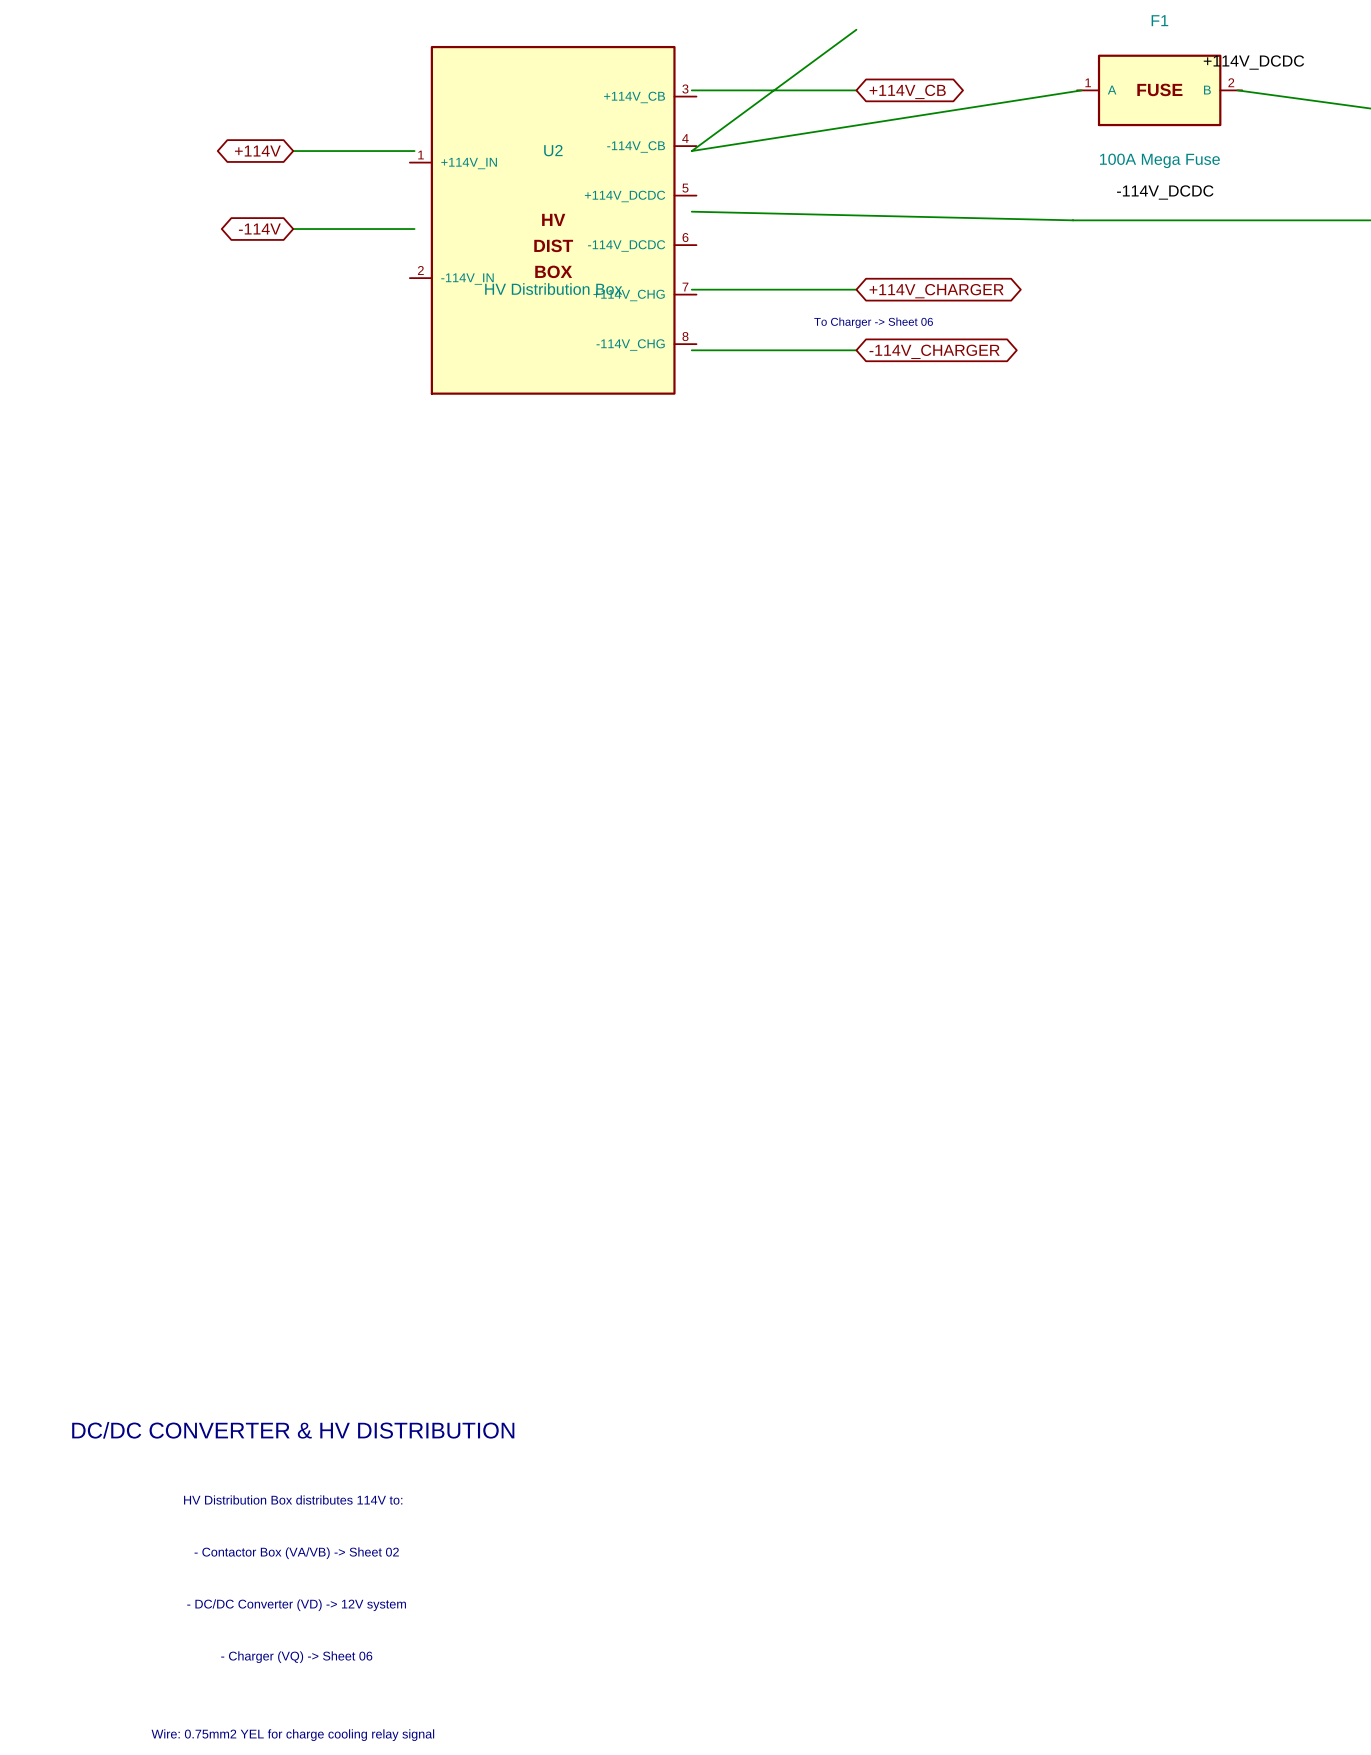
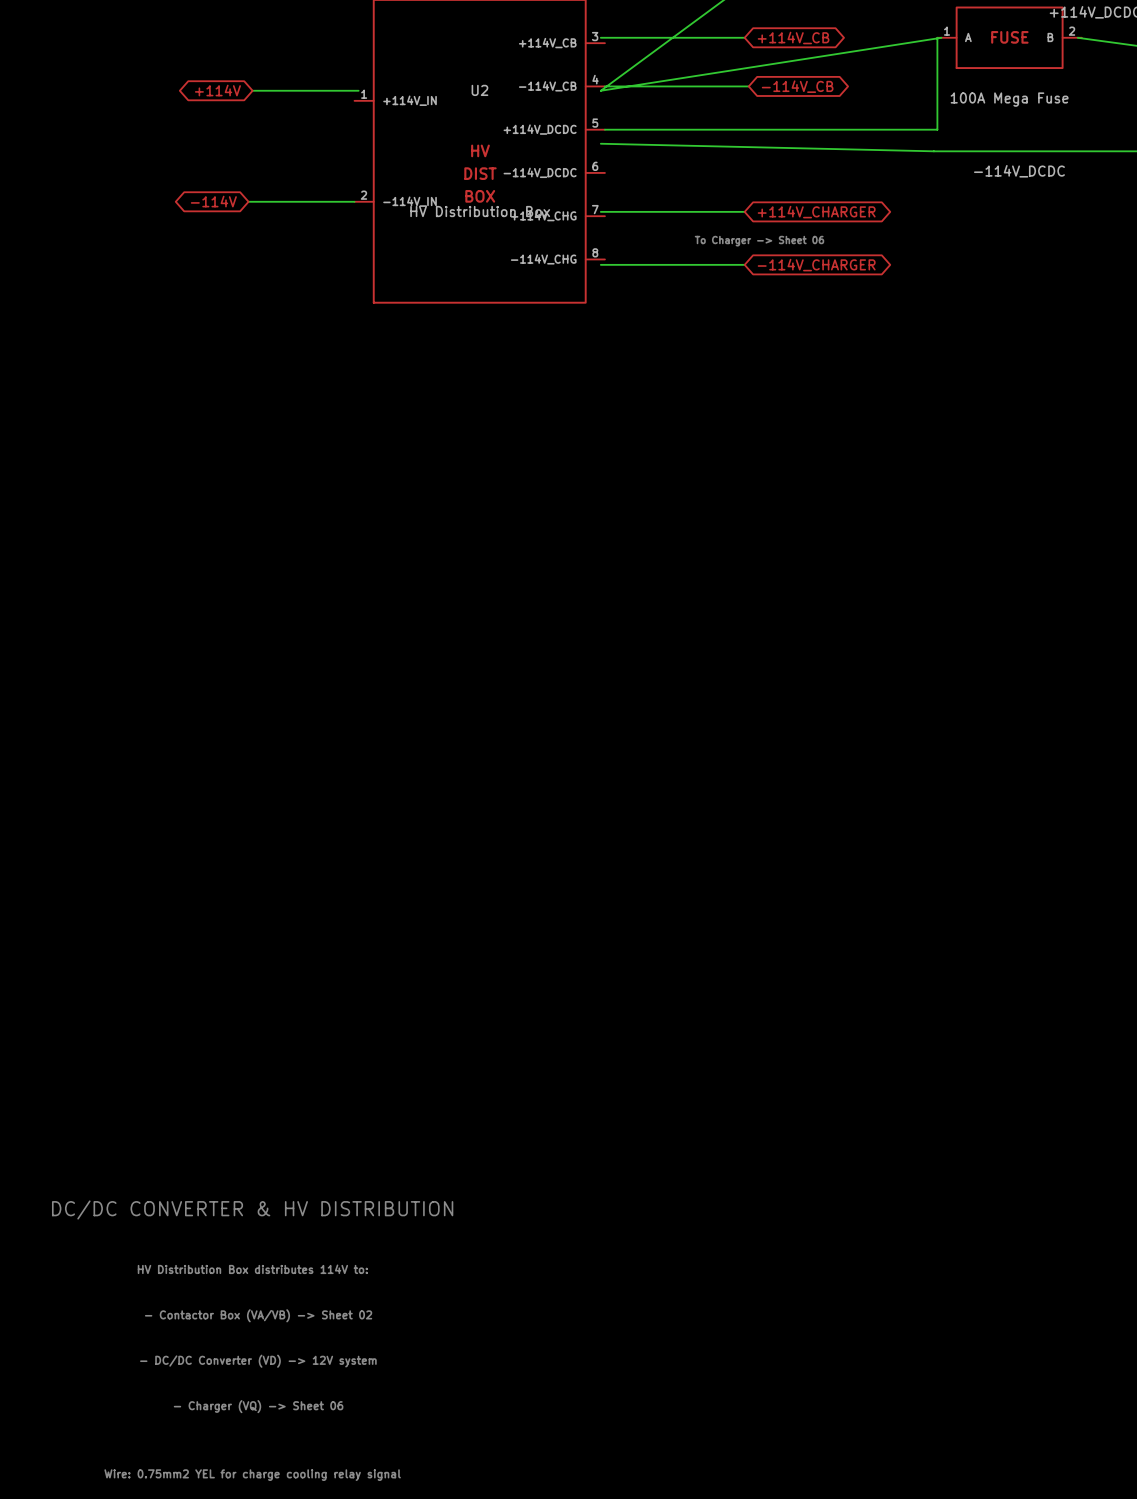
wire: none -> (937, 37) (937, 129) (604, 129)
wire: none -> (604, 86) (748, 86)
global label: none -> -114V_CB (797, 86)
label position: -114V_DCDC (1165, 192) -> -114V_DCDC (1019, 171)
global label position: -114V (259, 229) -> -114V (213, 201)
wire: (293, 229) (414, 229) -> (248, 201) (354, 201)

